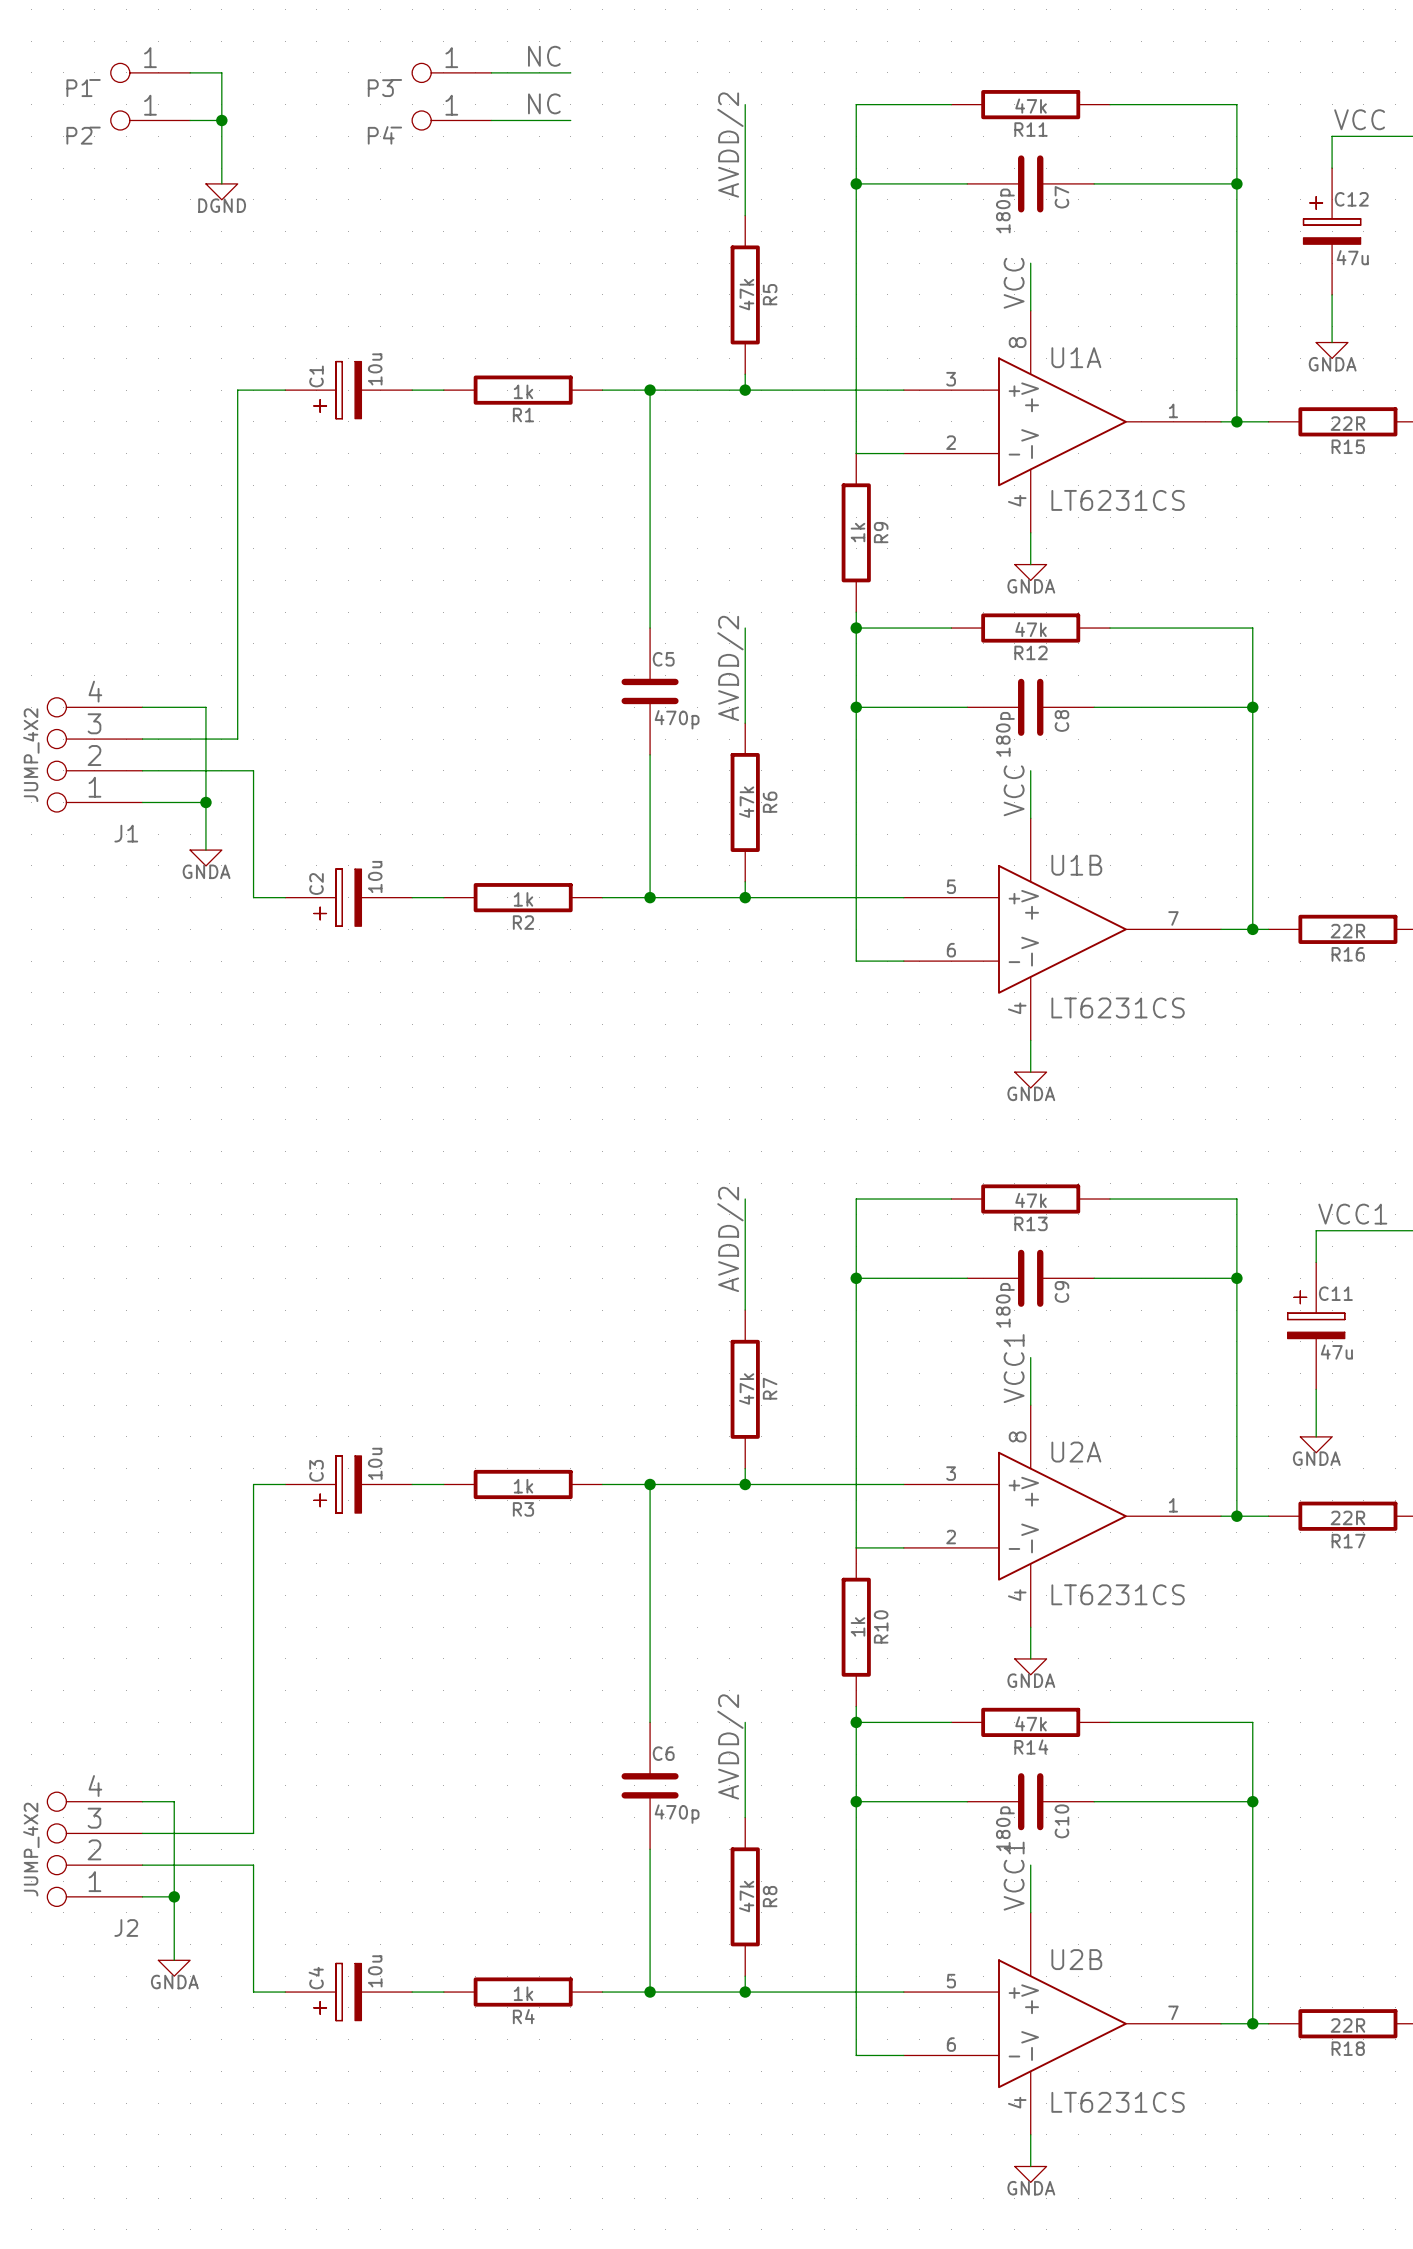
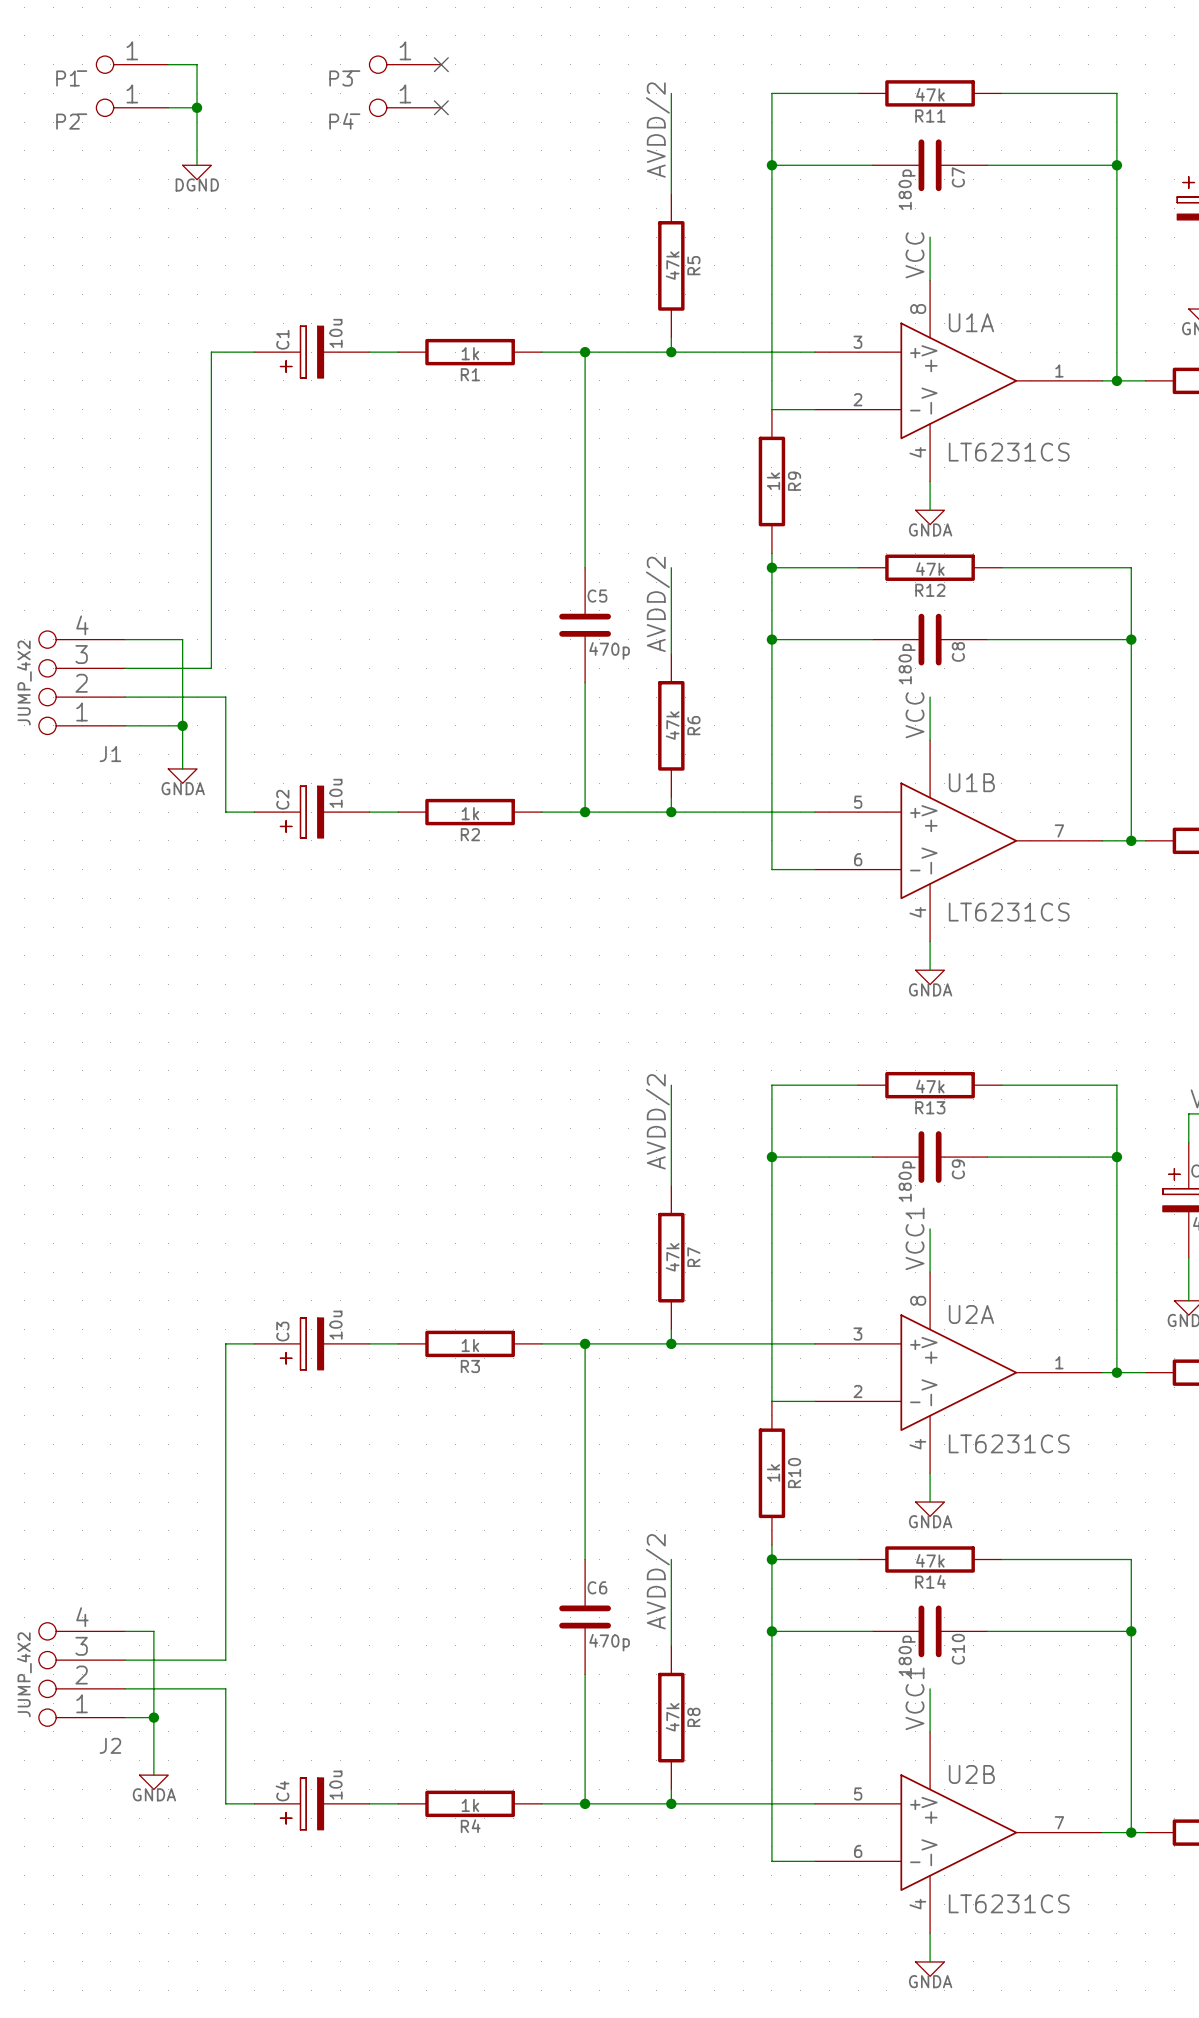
label: NC (544, 56) -> none
wire: (491, 72) (570, 72) -> none
no-connect mark: none -> (441, 64)
label: NC (544, 103) -> none
wire: (491, 120) (570, 120) -> none
no-connect mark: none -> (441, 107)

